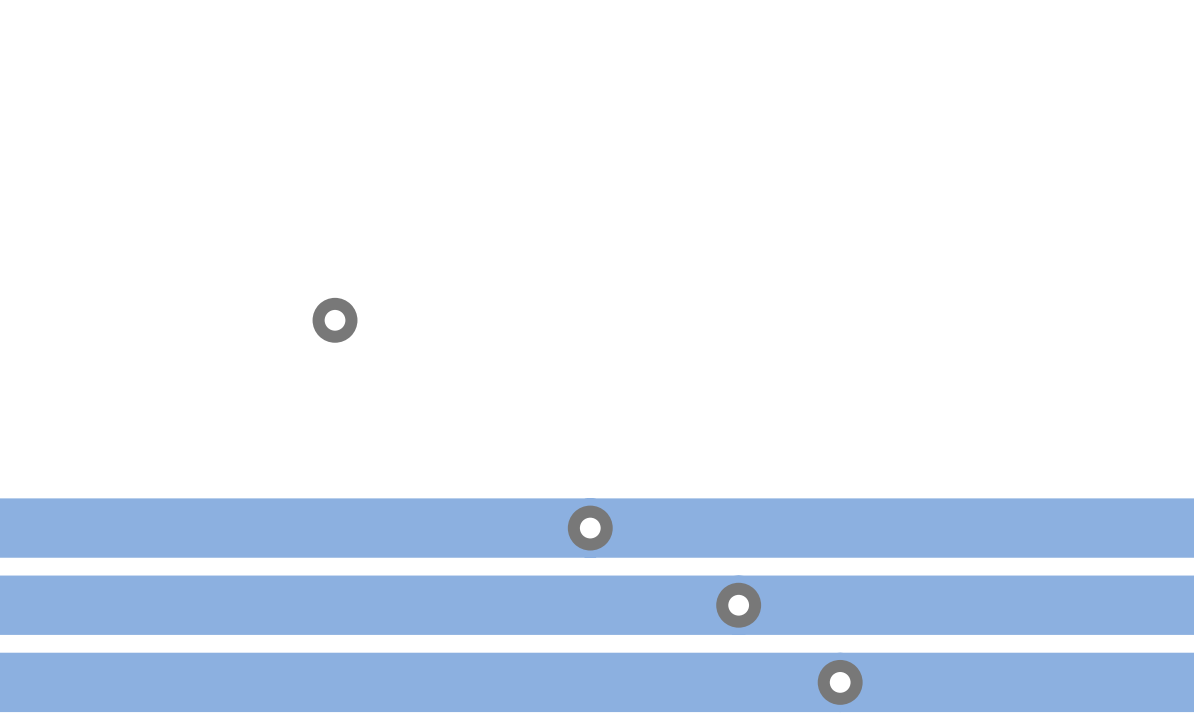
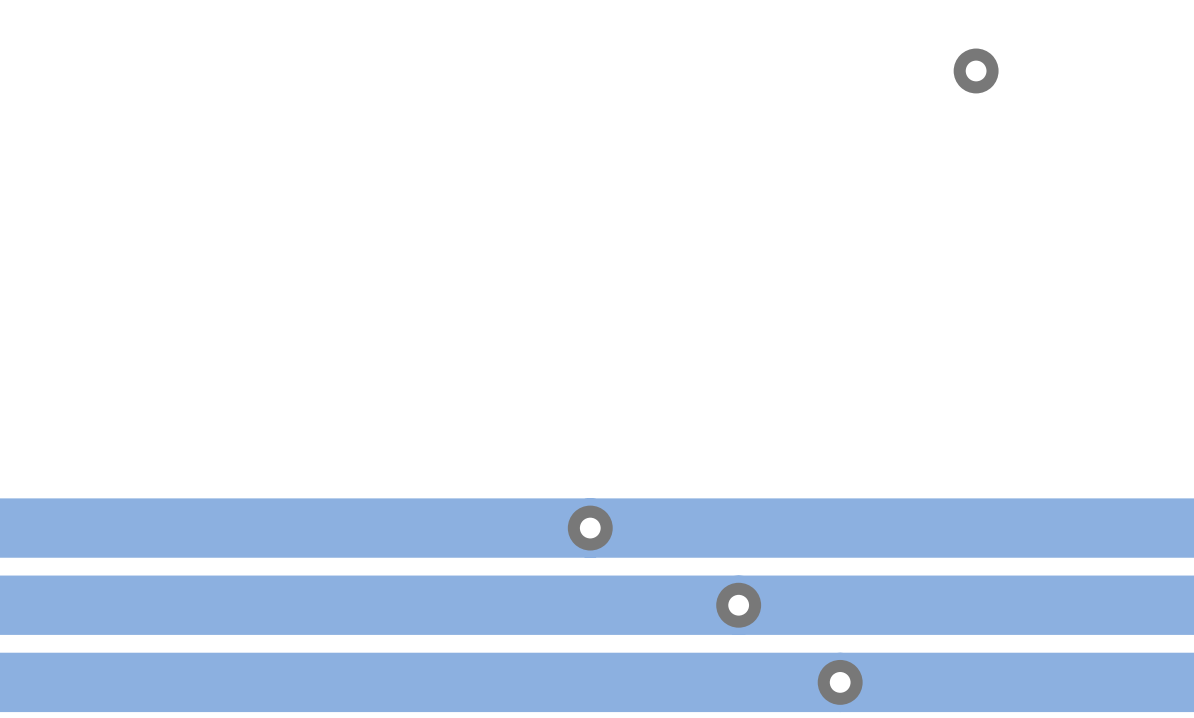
via: none -> (976, 70)
via: (335, 320) -> none

